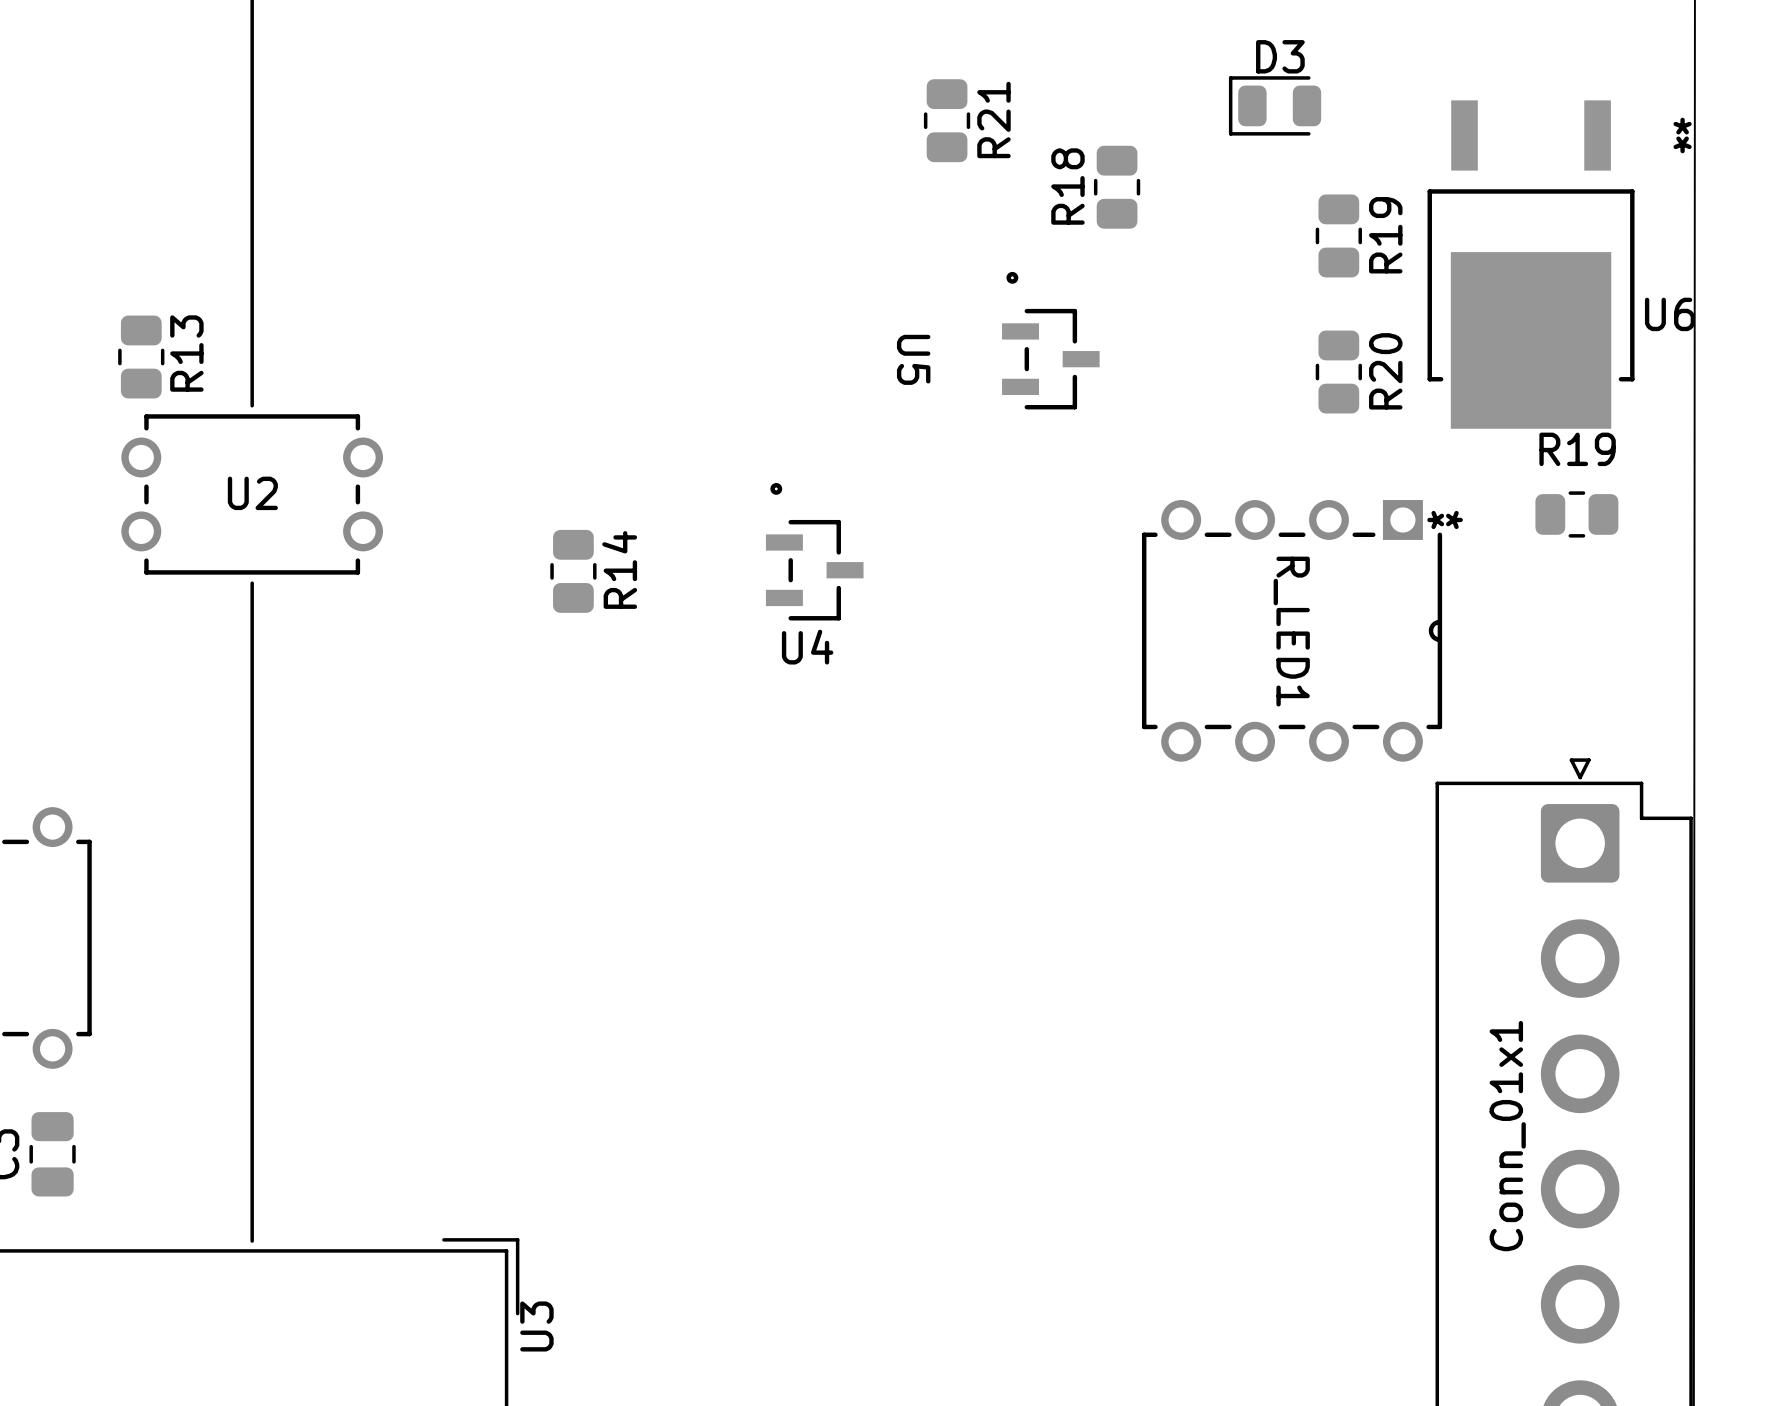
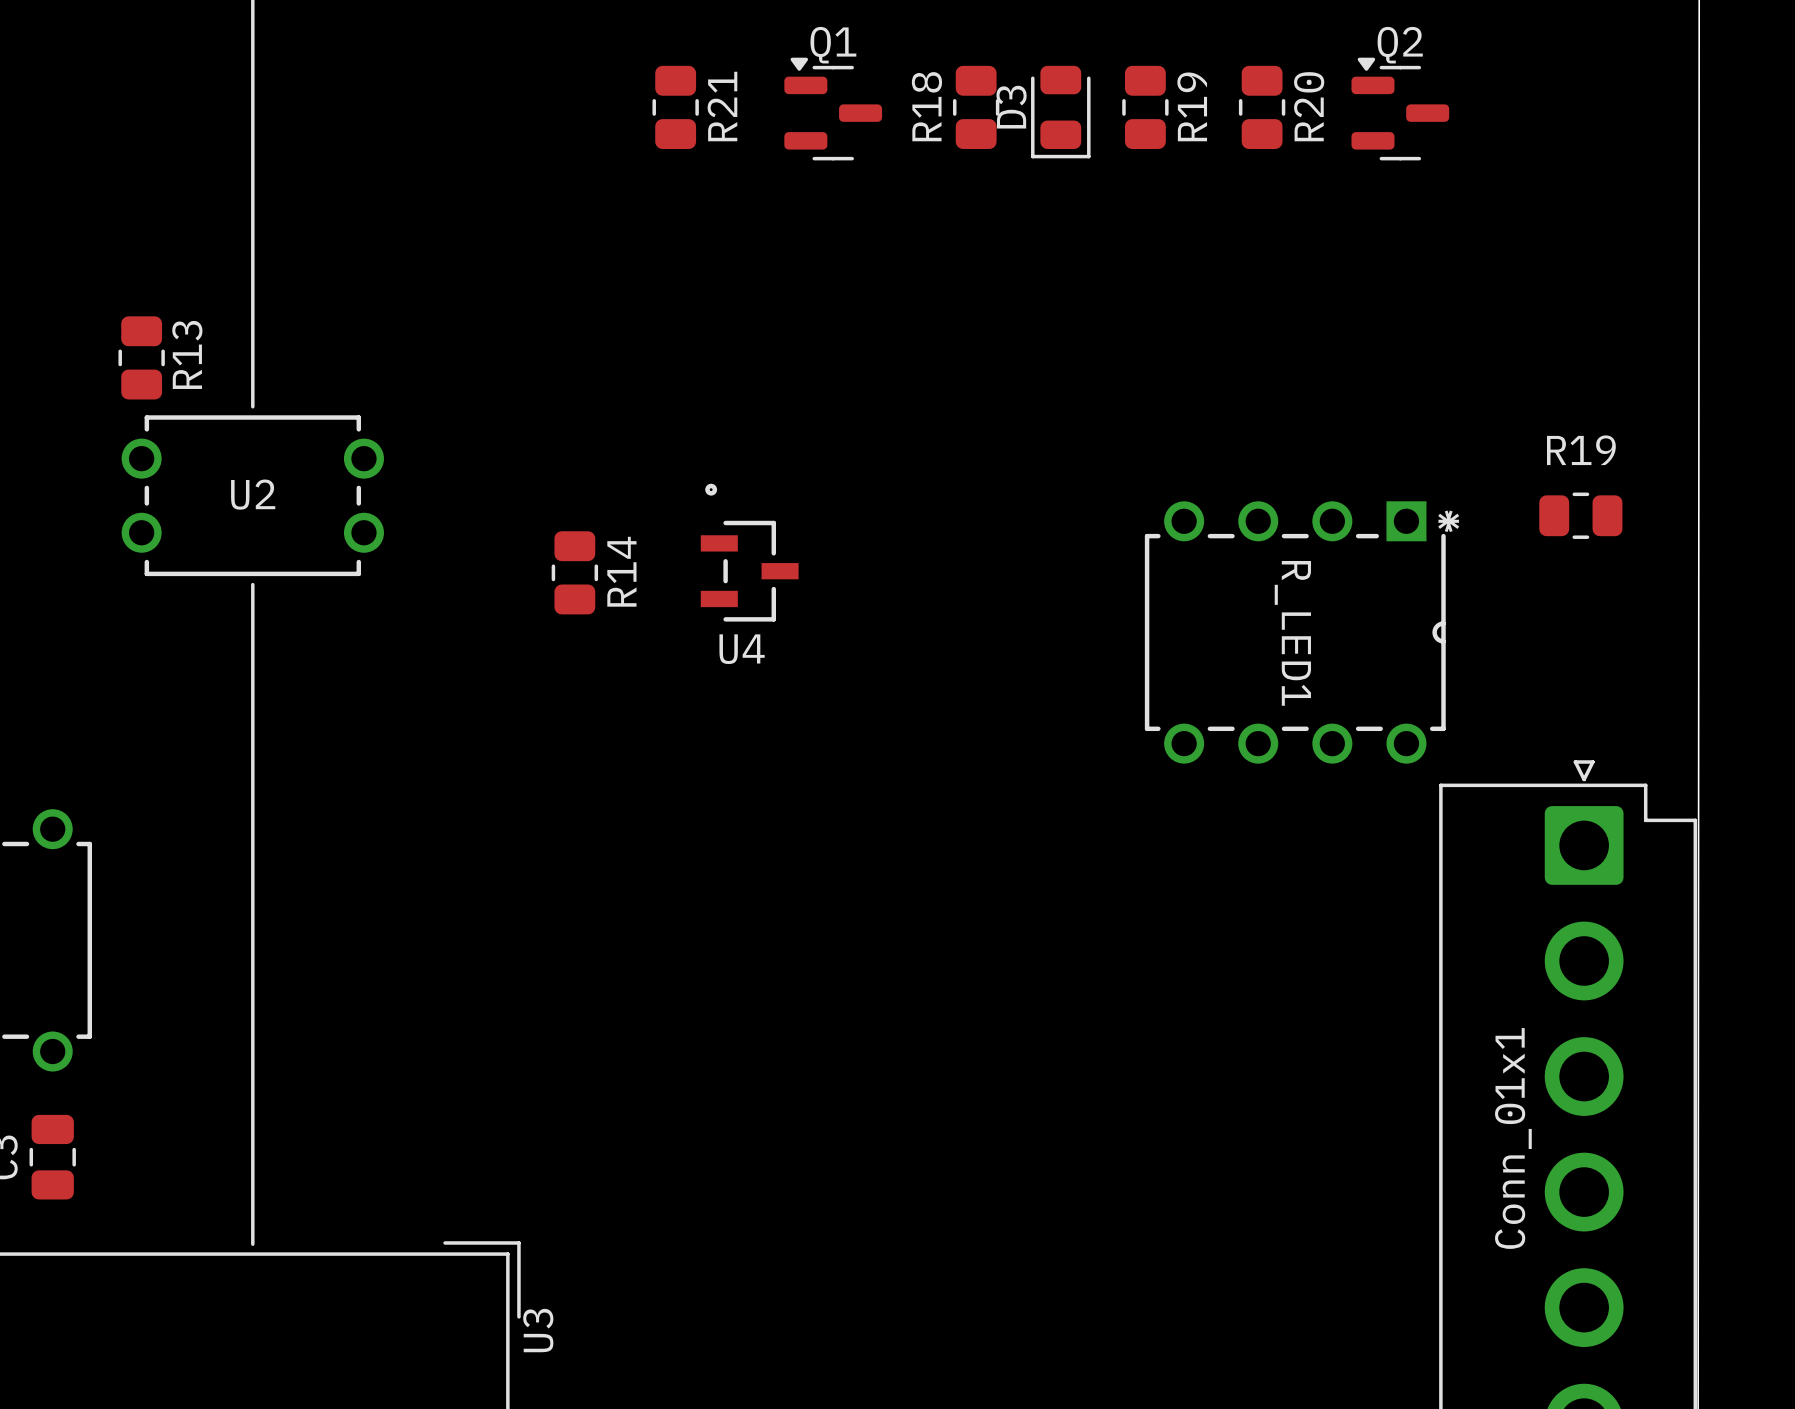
D3 rotation: 0° (1275, 105) -> 90° counterclockwise (1060, 112)
D3 position: (1275, 105) -> (1060, 112)
Q1: none -> (833, 109)
Q2: none -> (1400, 109)
R21 position: (947, 120) -> (675, 107)
R18 position: (1117, 187) -> (976, 107)
R19 position: (1338, 235) -> (1145, 107)
U6: (1531, 264) -> none
U5: (1050, 340) -> none
R20 position: (1338, 372) -> (1262, 107)
U4 position: (814, 551) -> (749, 552)

